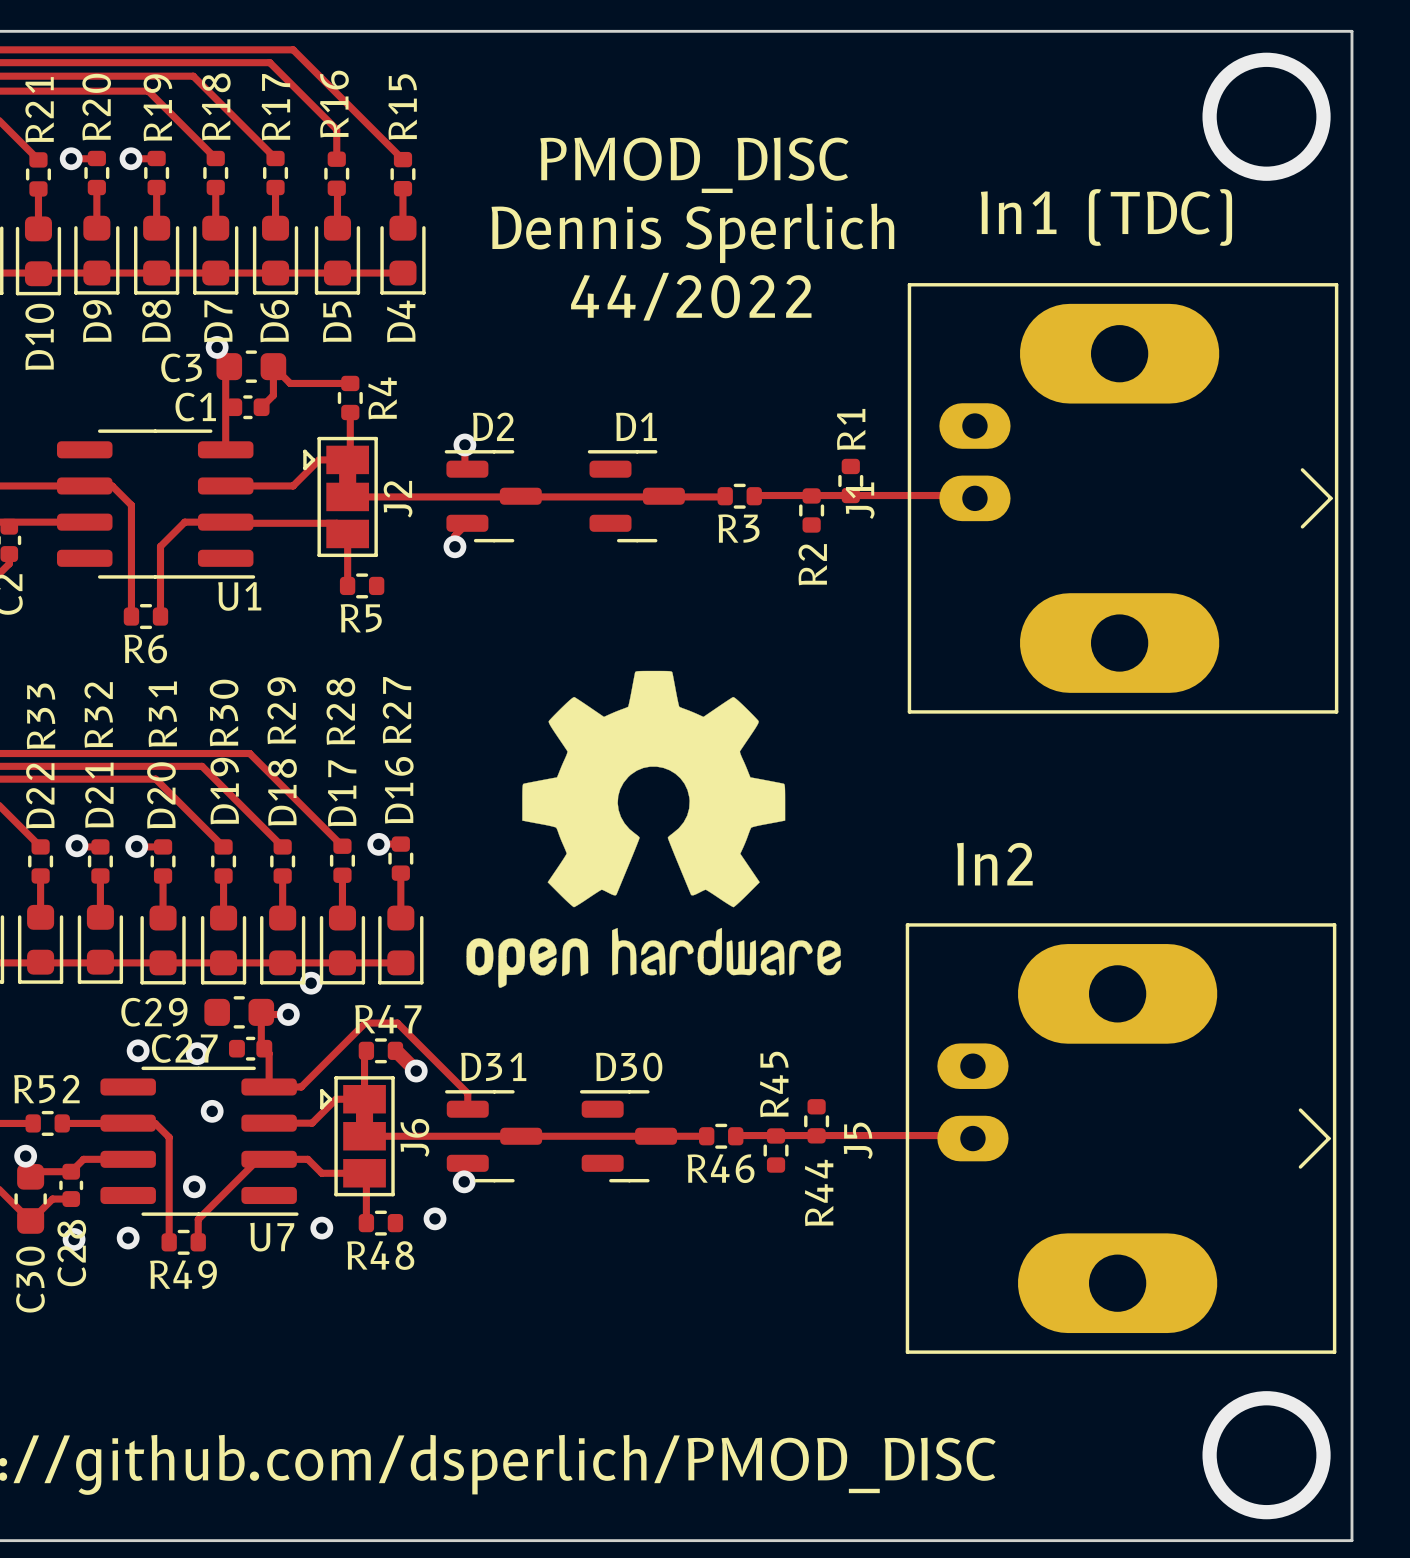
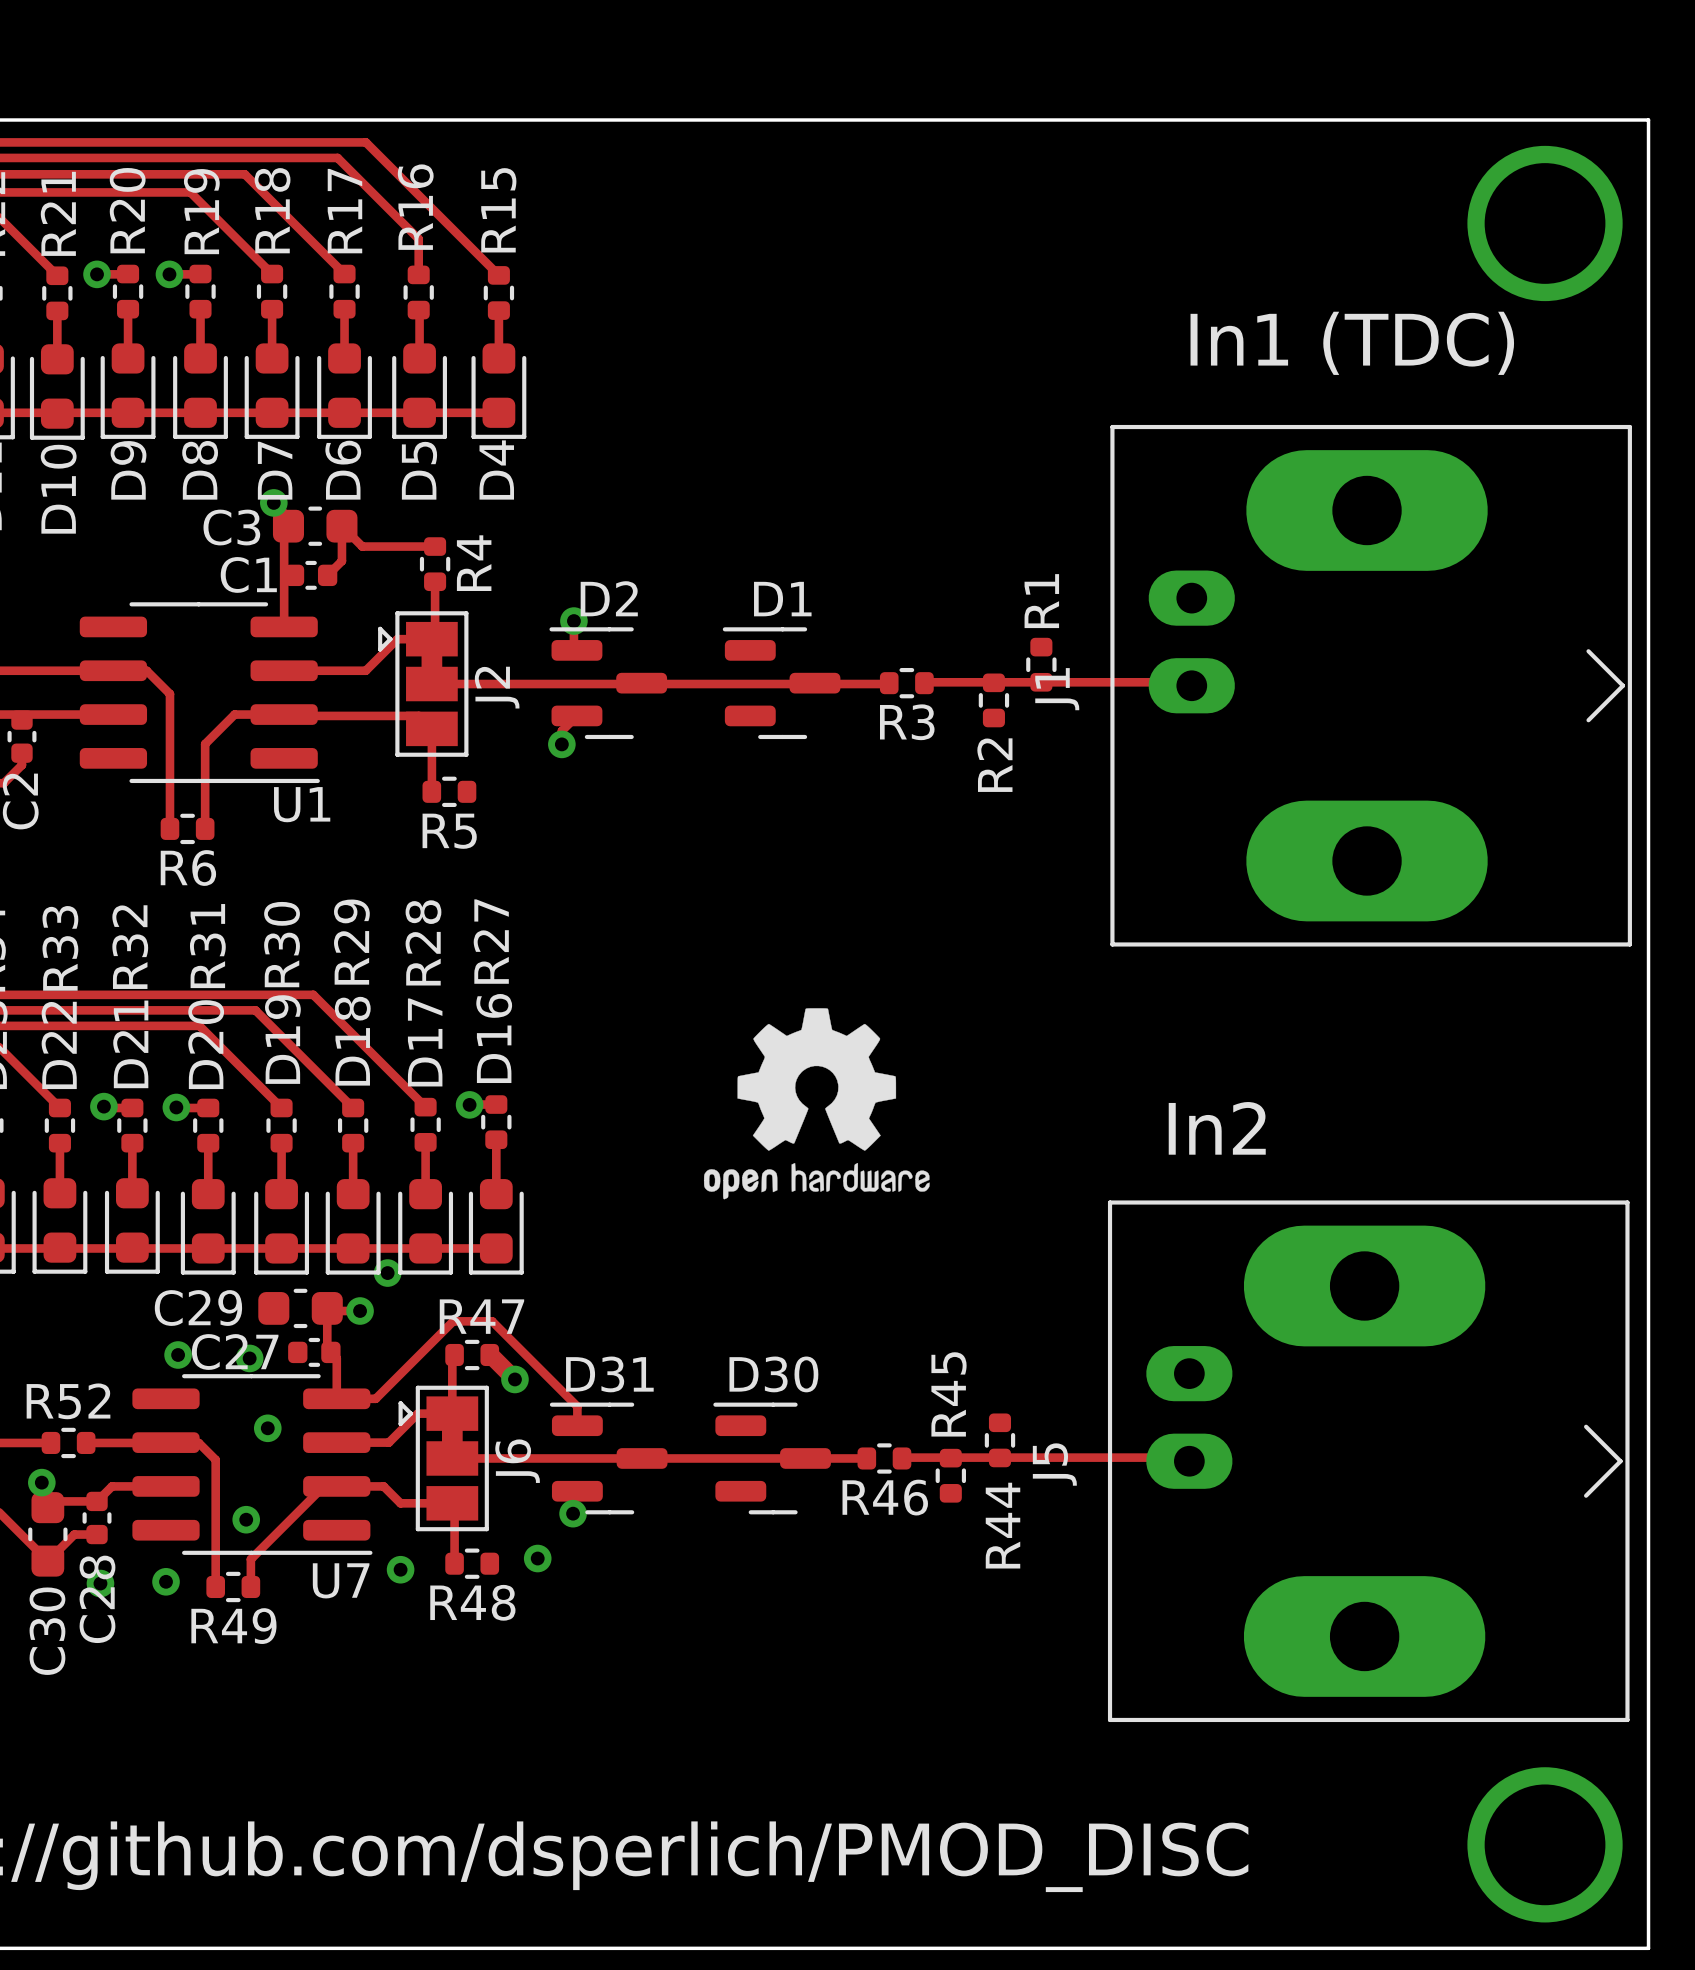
text: PMOD_DISC (694, 165) -> none
text: Dennis Sperlich (692, 233) -> none
text: 44/2022 (691, 296) -> none
drawing shape: [466, 670, 841, 988] -> [703, 1008, 930, 1200]

